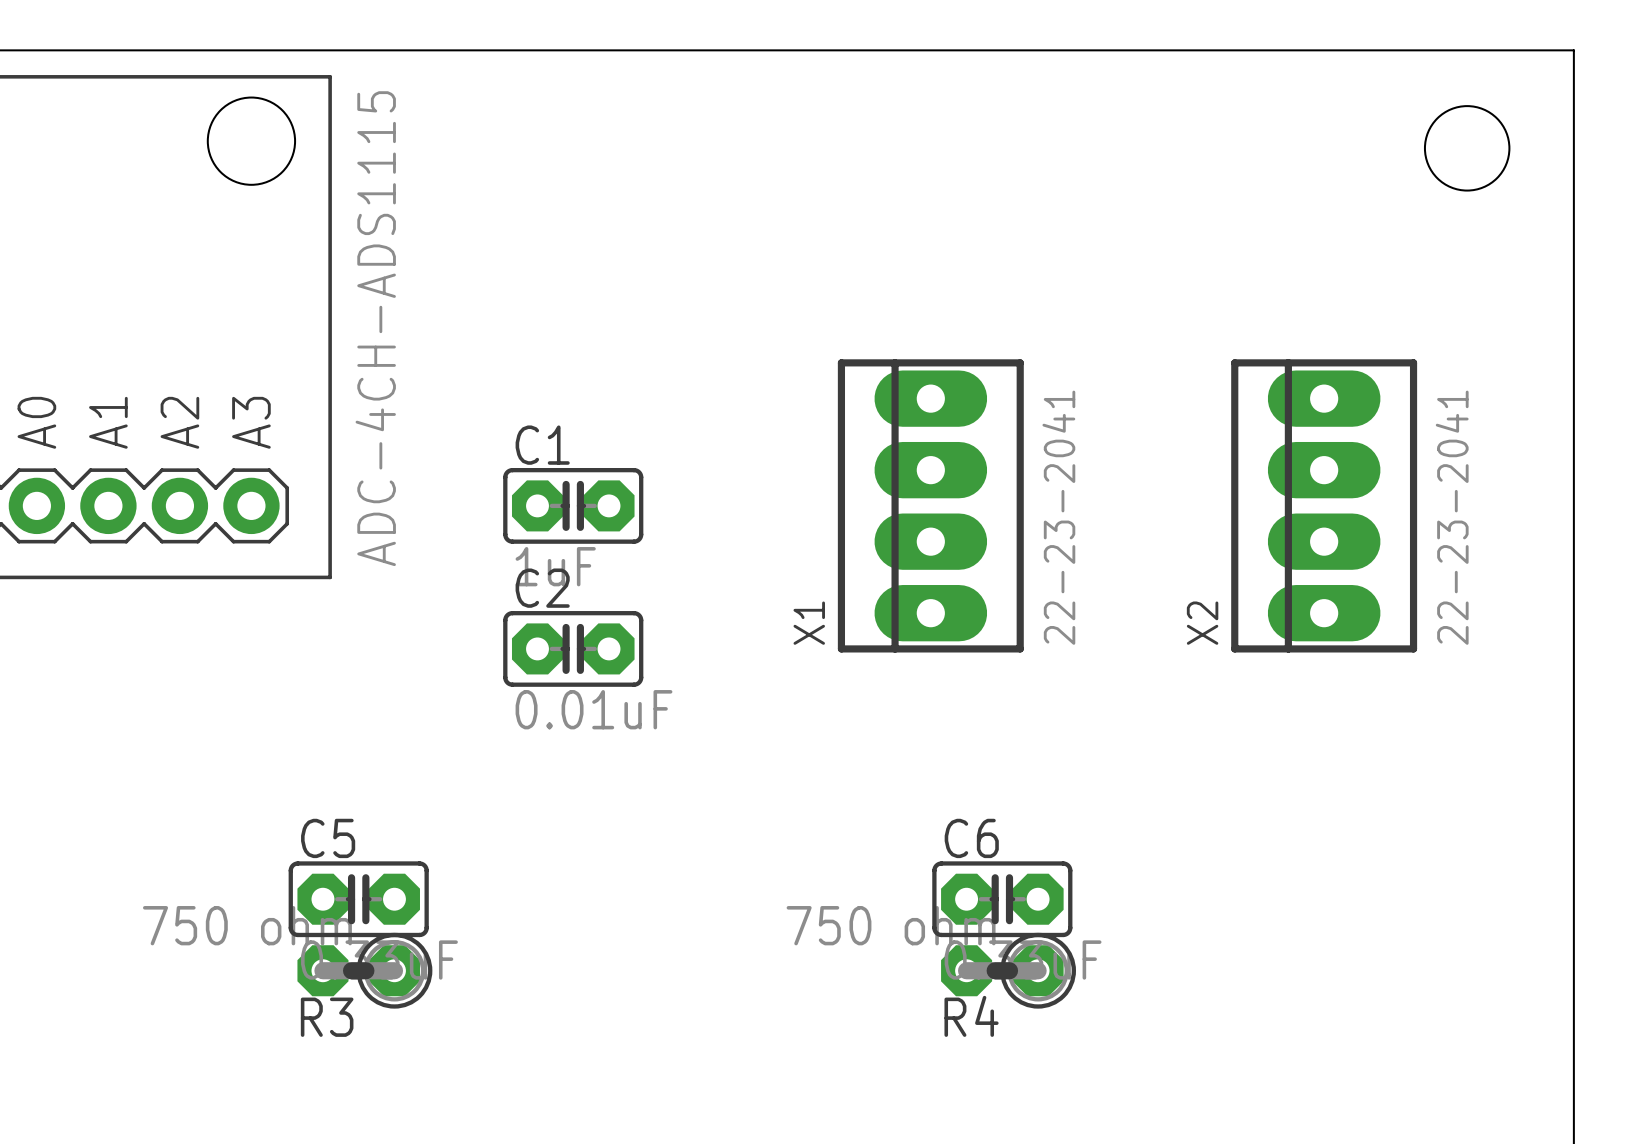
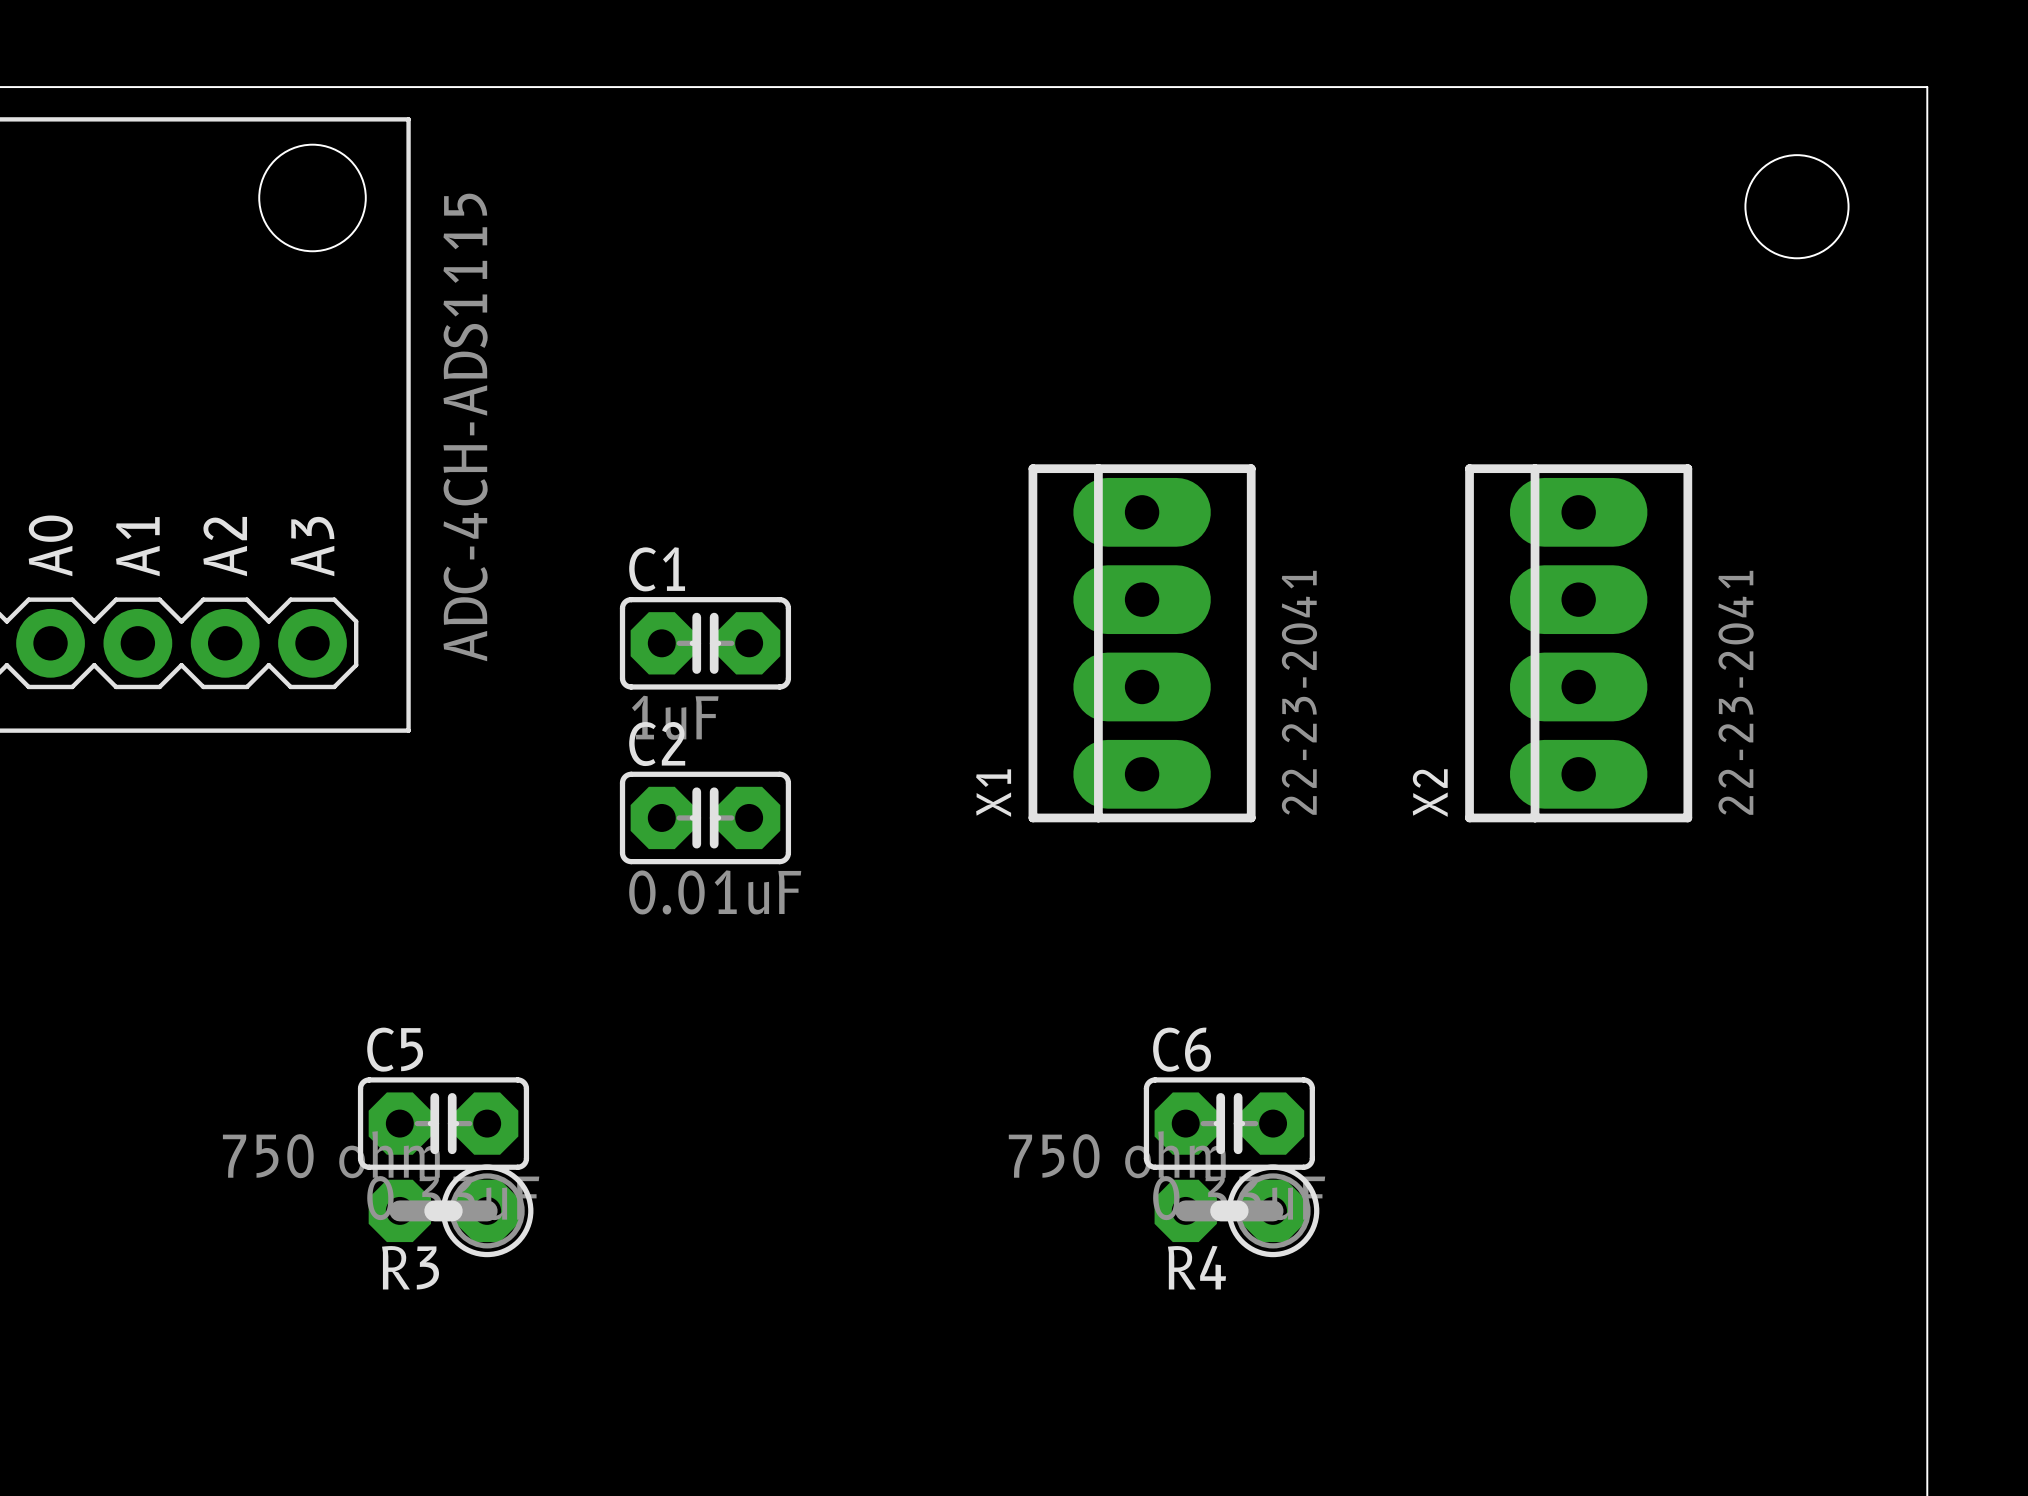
X2 position: (1324, 505) -> (1578, 643)

